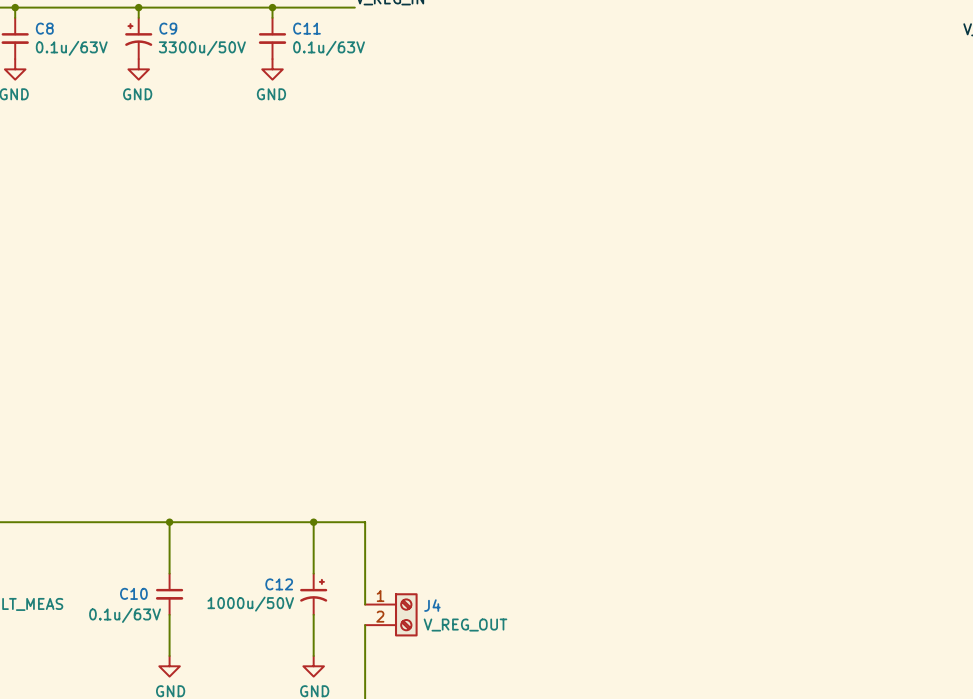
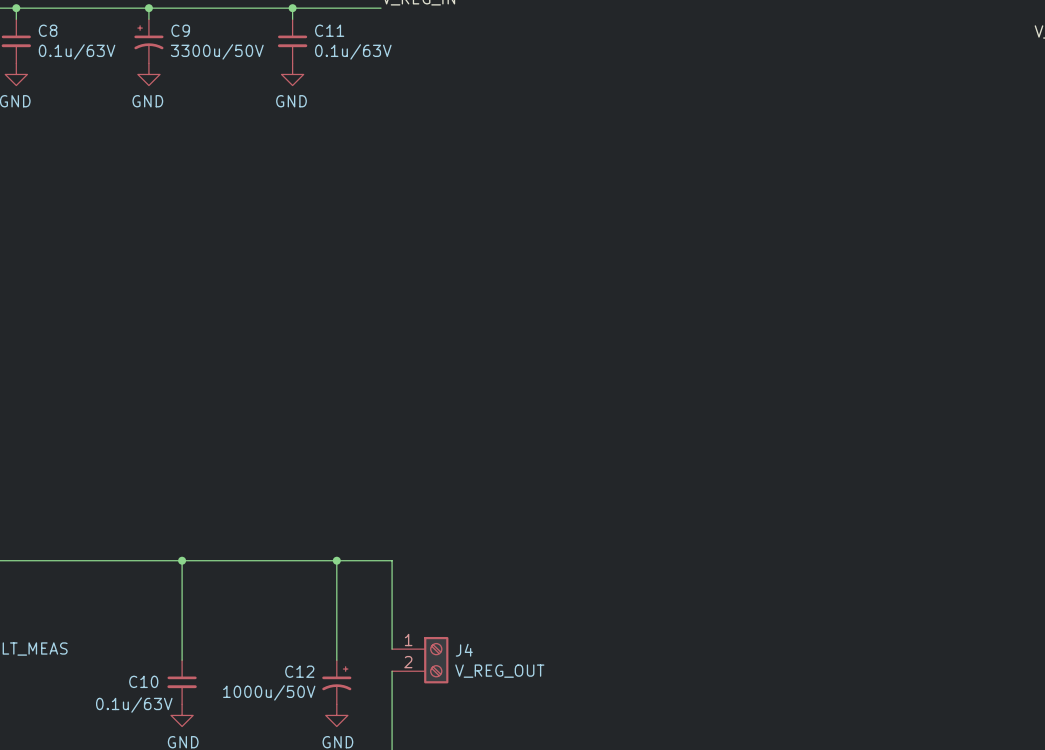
C10 position: (169, 594) -> (182, 682)
C12 position: (313, 594) -> (336, 682)

